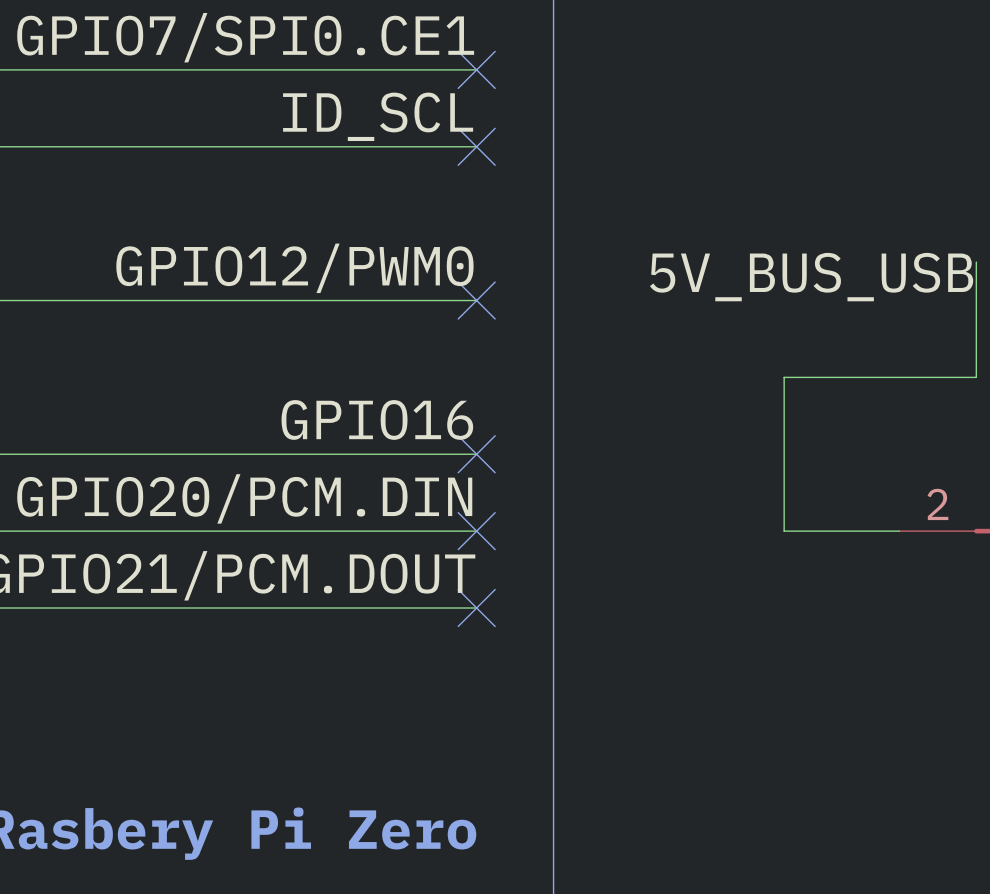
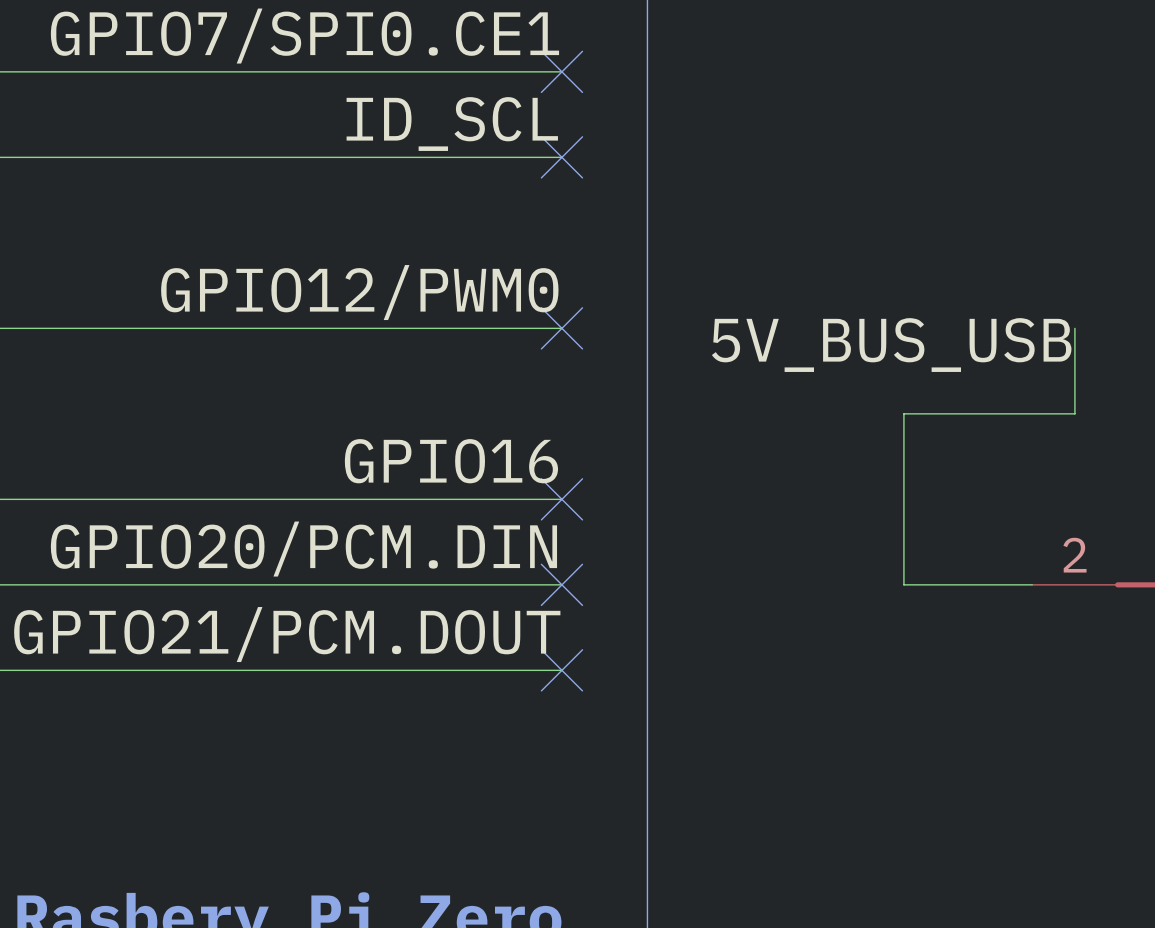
wire: (976, 262) (976, 377) (937, 377) -> (1074, 328) (1074, 413)
label position: 5V_BUS_USB (811, 277) -> 5V_BUS_USB (891, 345)

